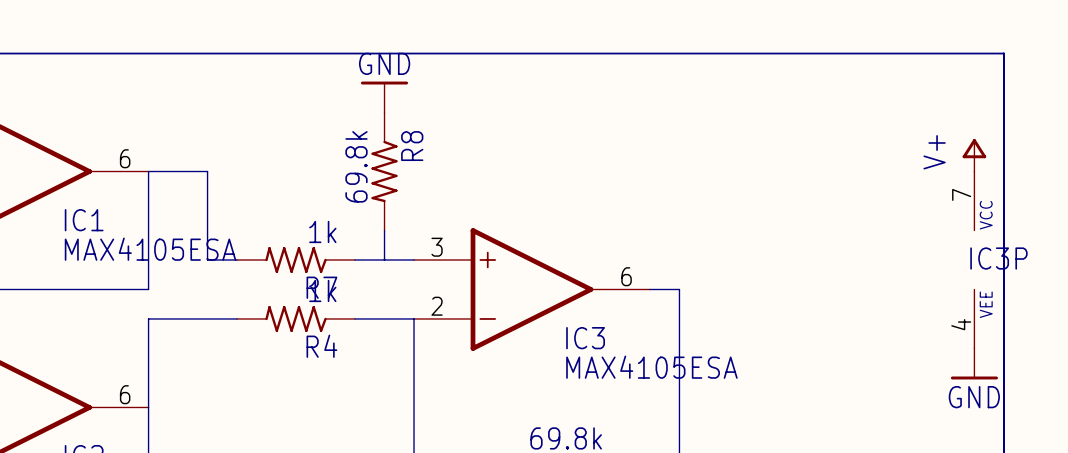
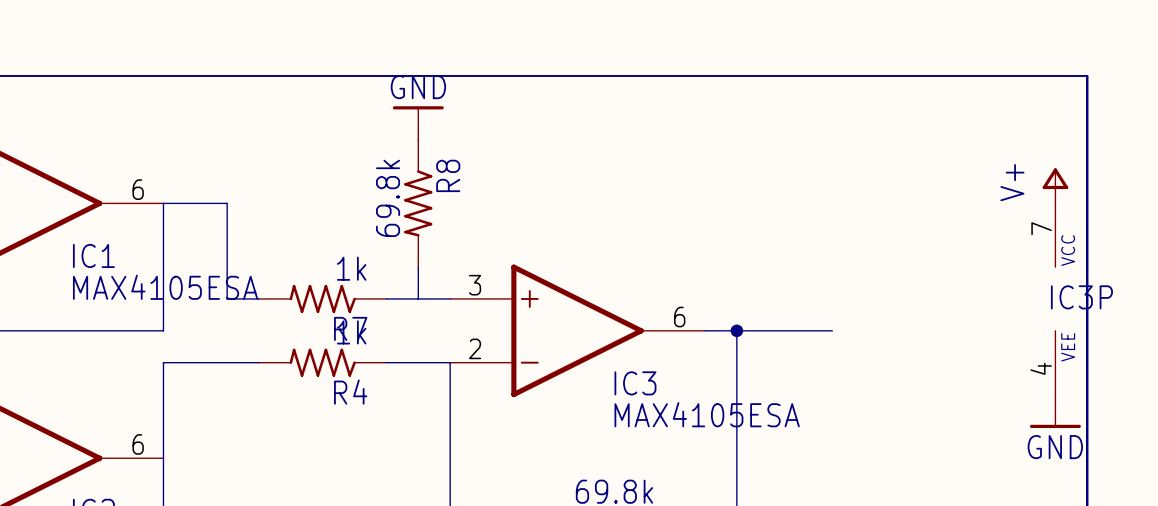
wire: none -> (736, 330) (832, 330)
junction: none -> (736, 330)

